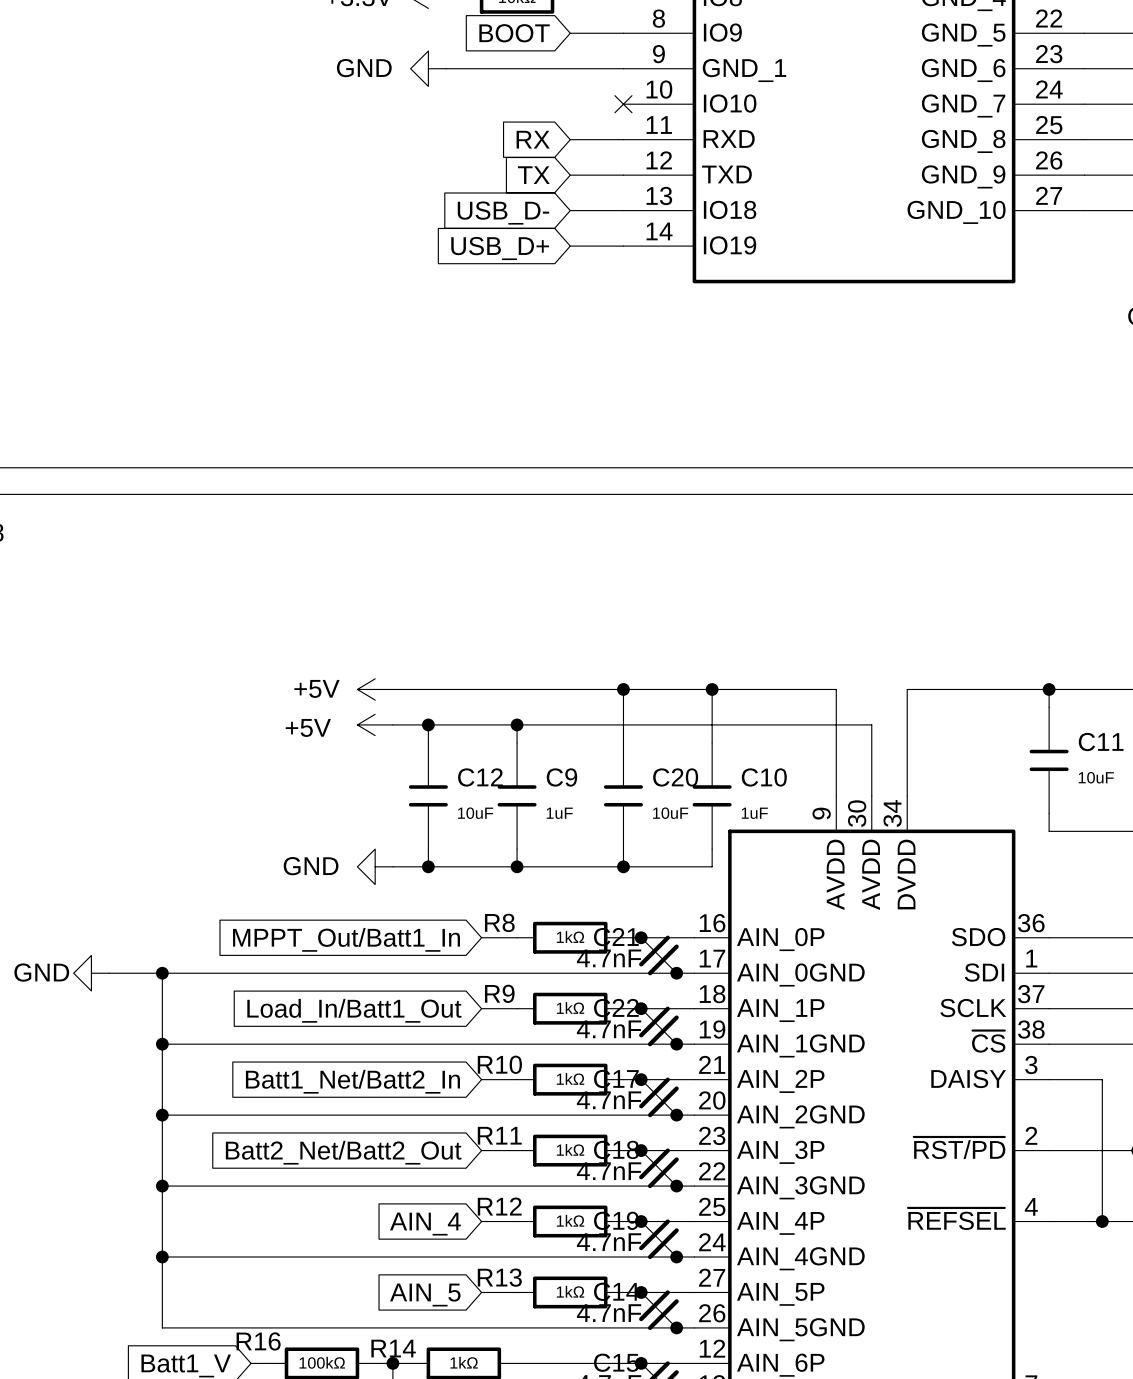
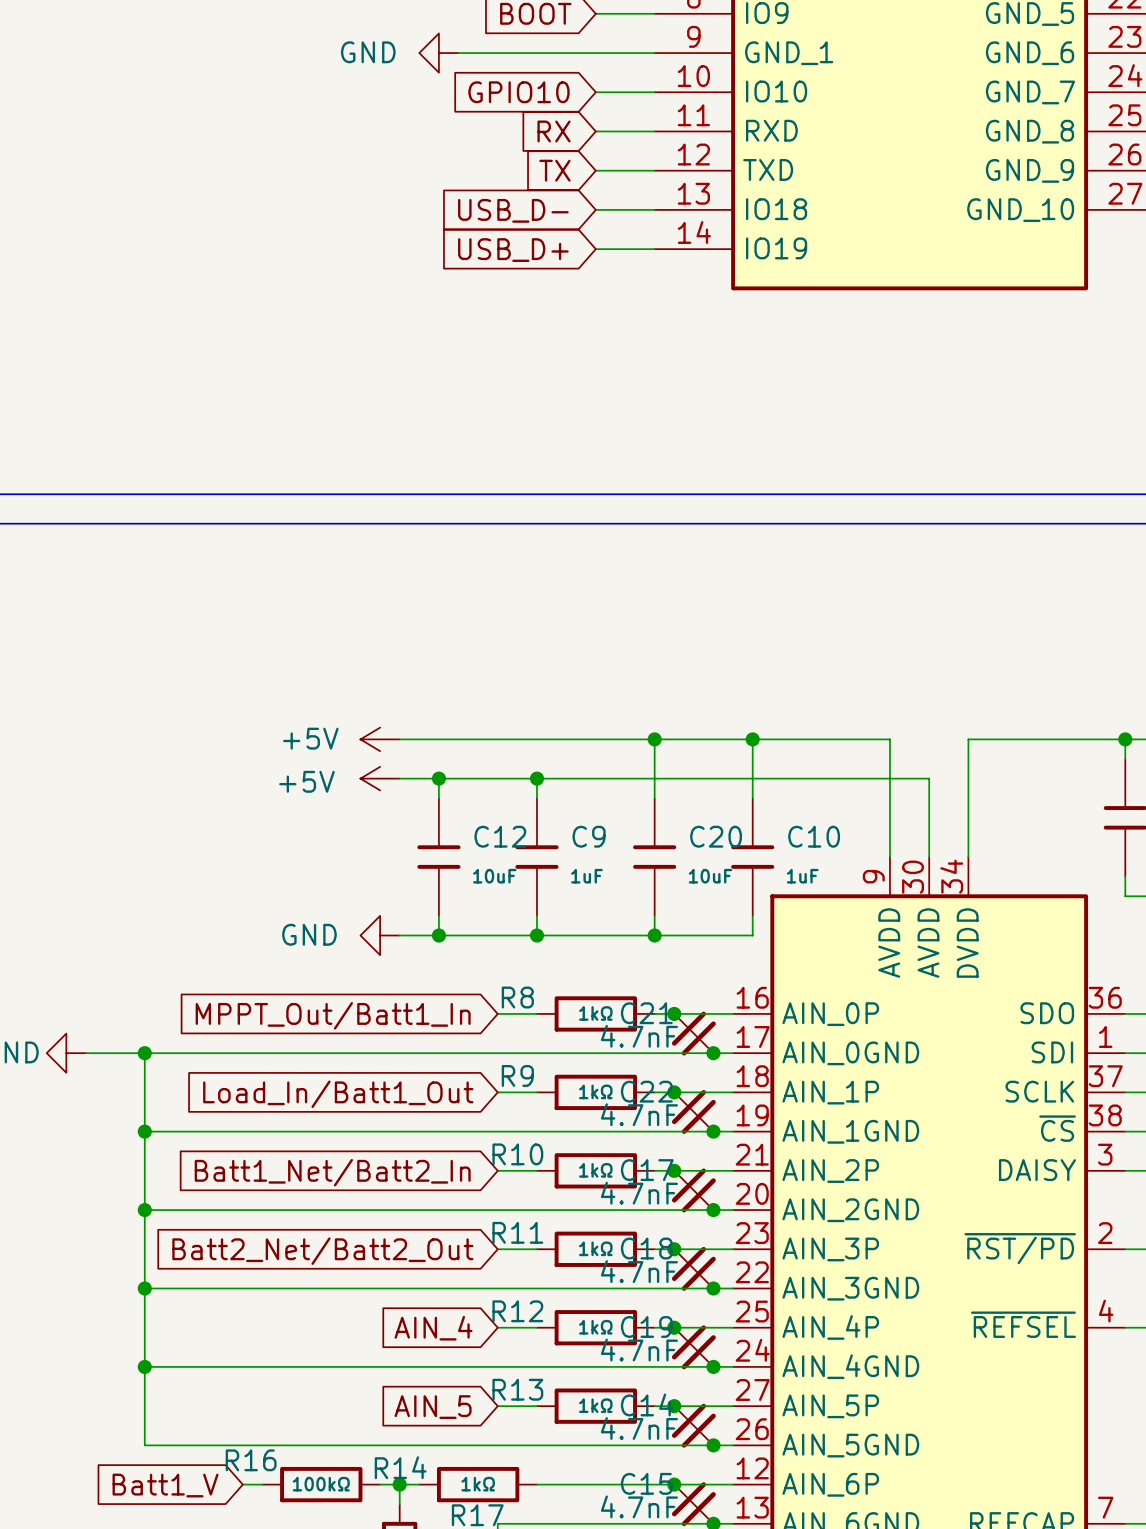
global label: none -> GPIO10 (518, 92)
wire: none -> (595, 92) (654, 92)
no-connect mark: (623, 104) -> none

